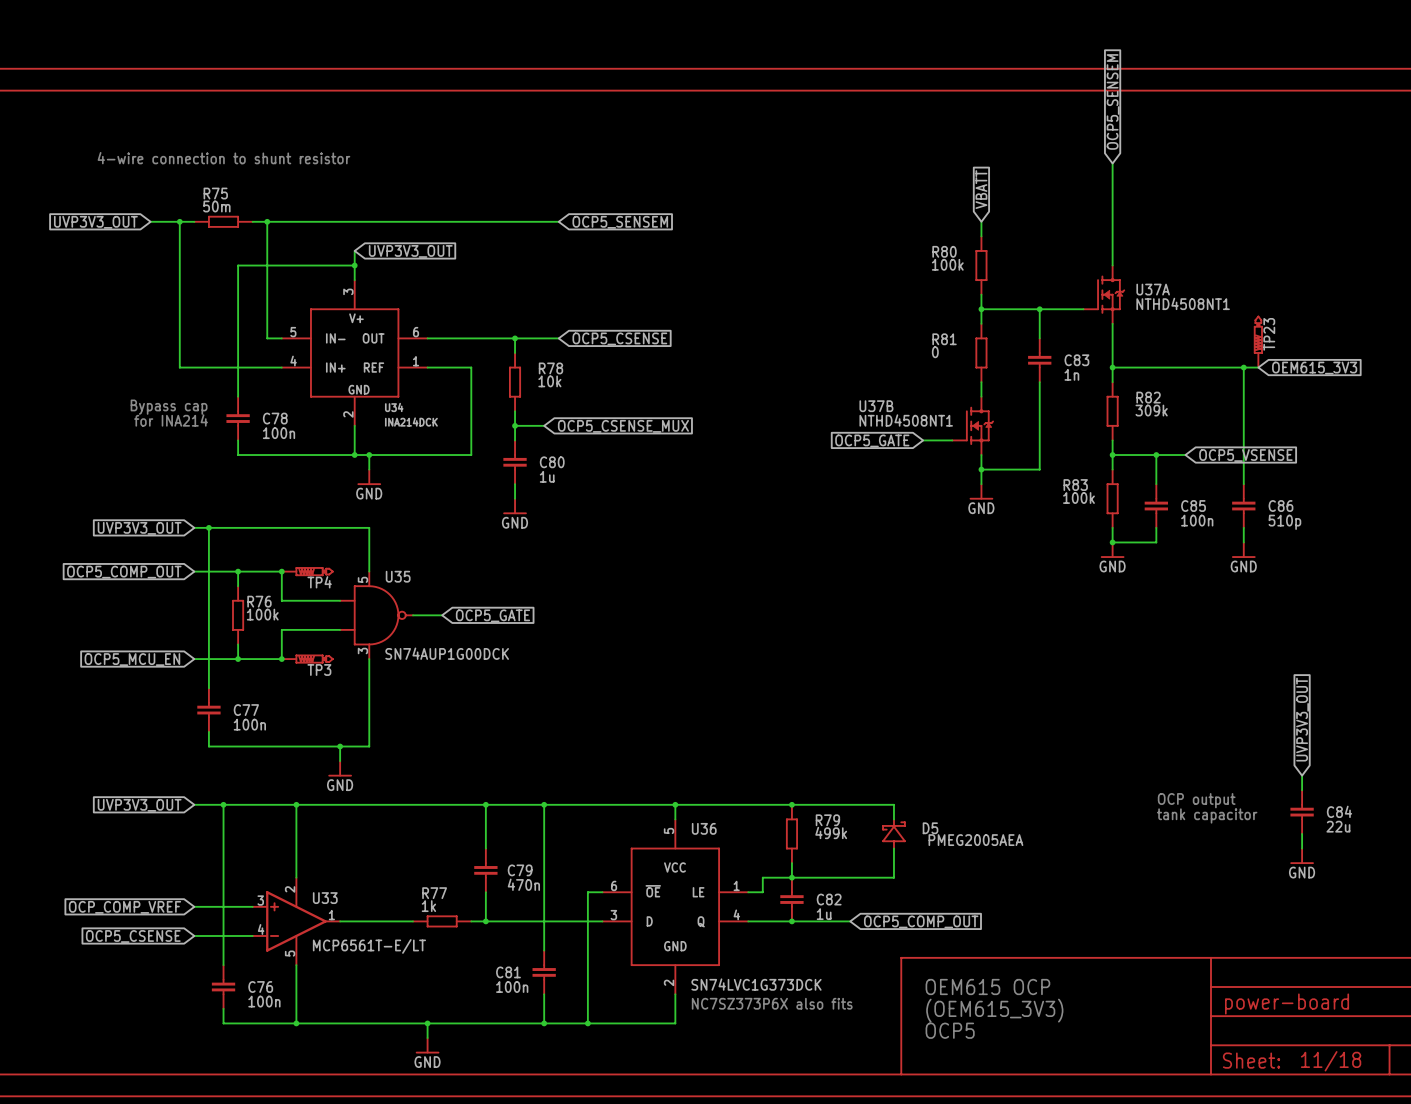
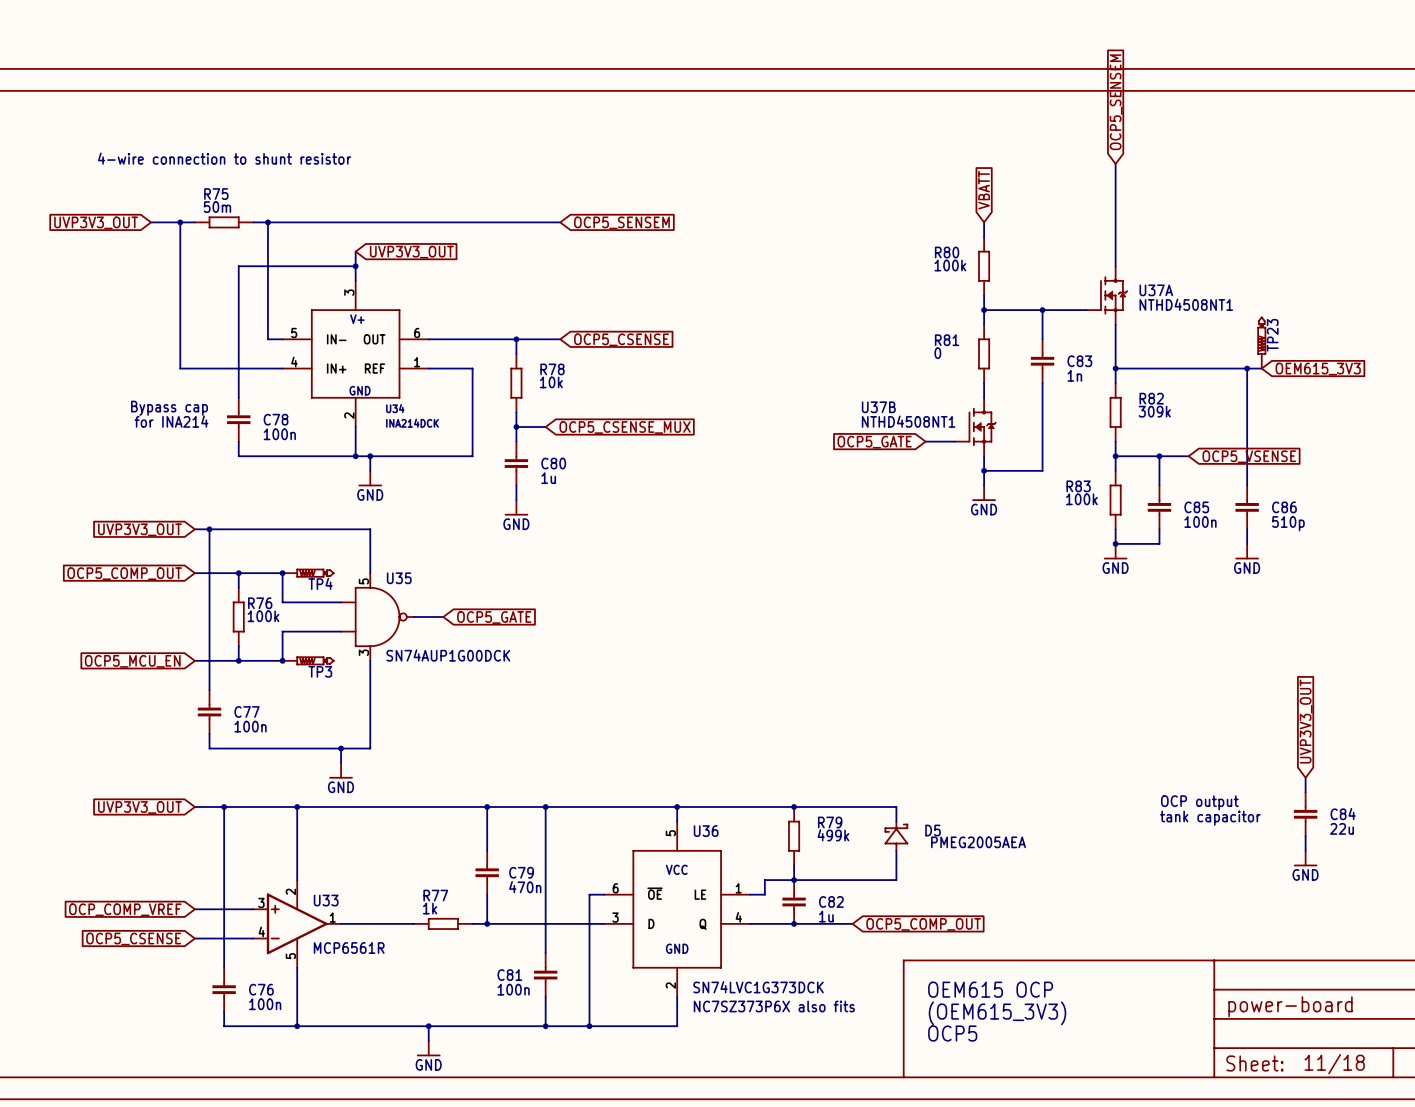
U33 value: MCP6561T-E/LT (369, 946) -> MCP6561R (349, 948)

